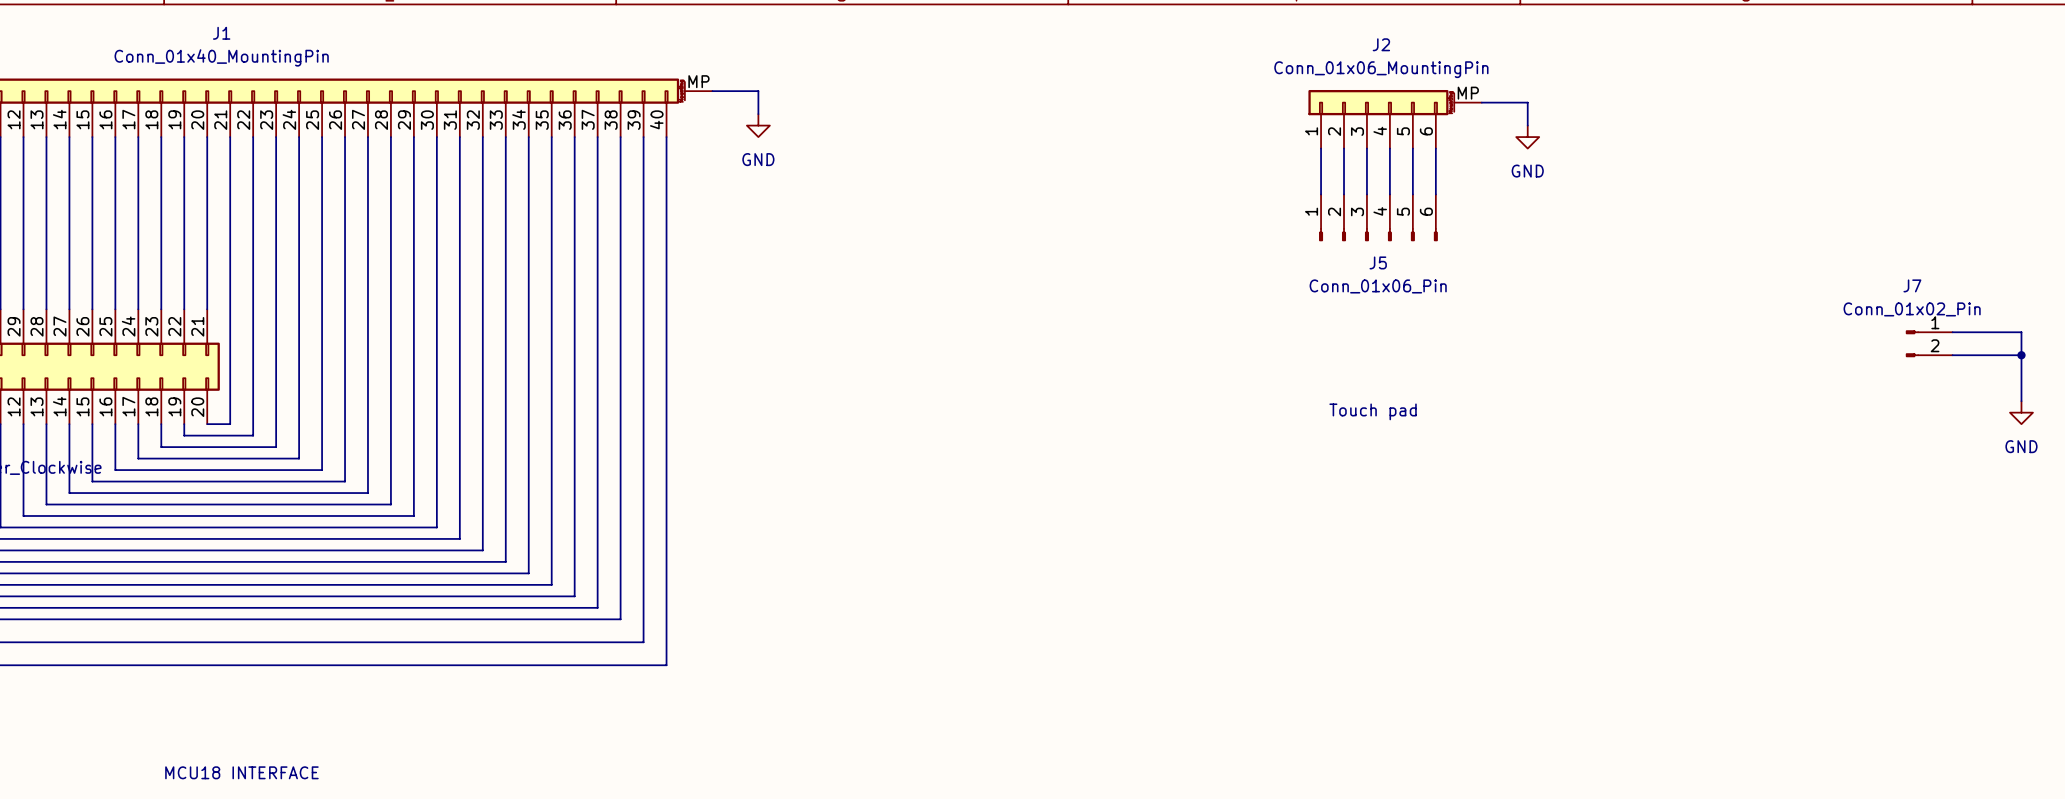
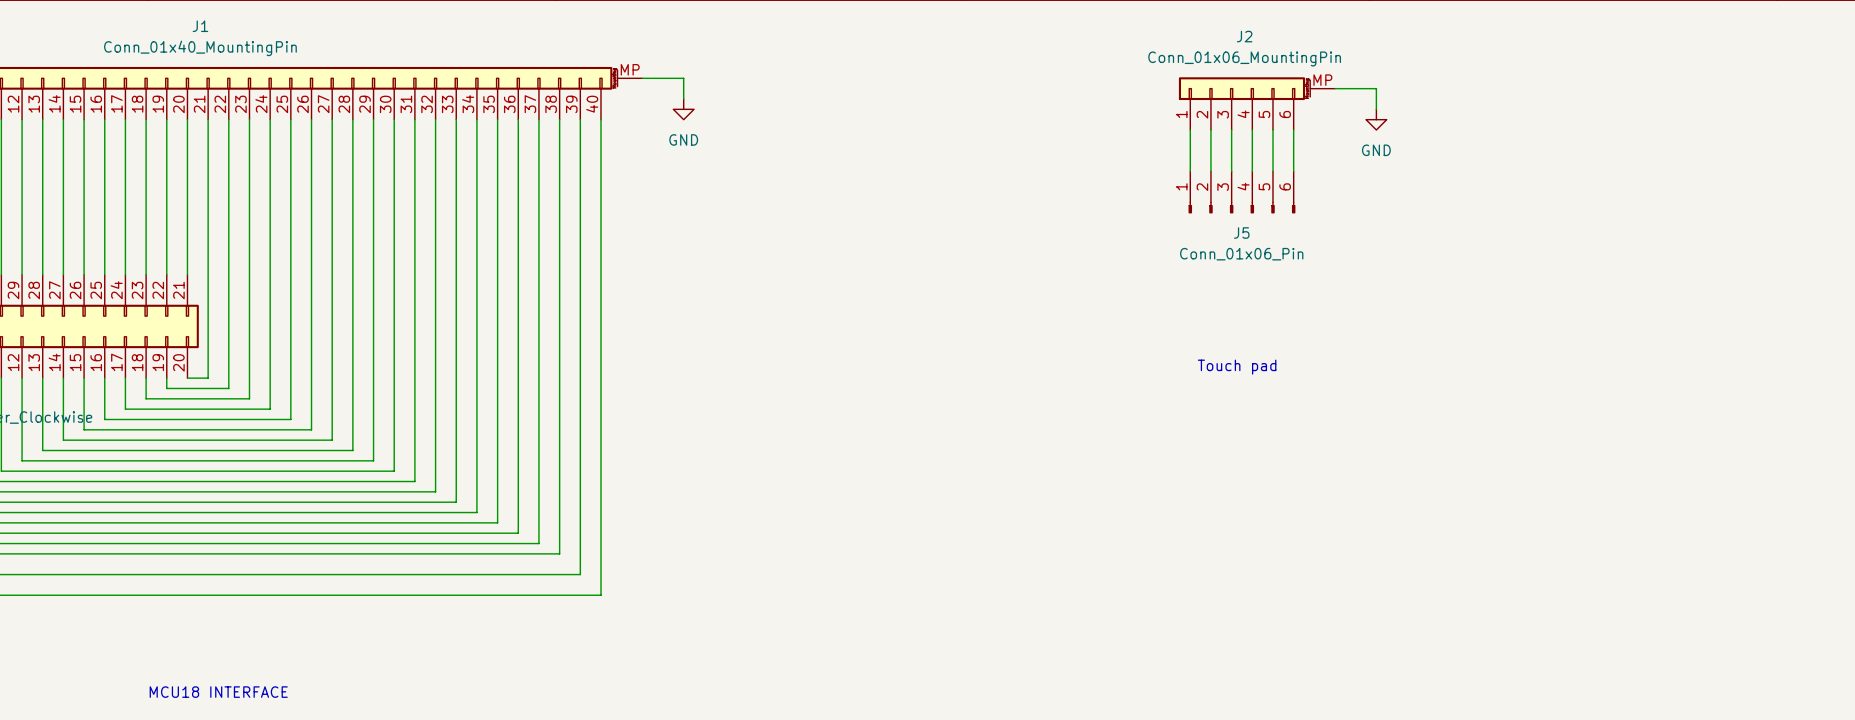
wire: (1952, 332) (2021, 332) (2021, 401) -> none
J7: Conn_01x02_Pin (1929, 343) -> none
wire: (1952, 355) (2021, 355) -> none
junction: (2021, 355) -> none
power symbol: GND (2021, 412) -> none

